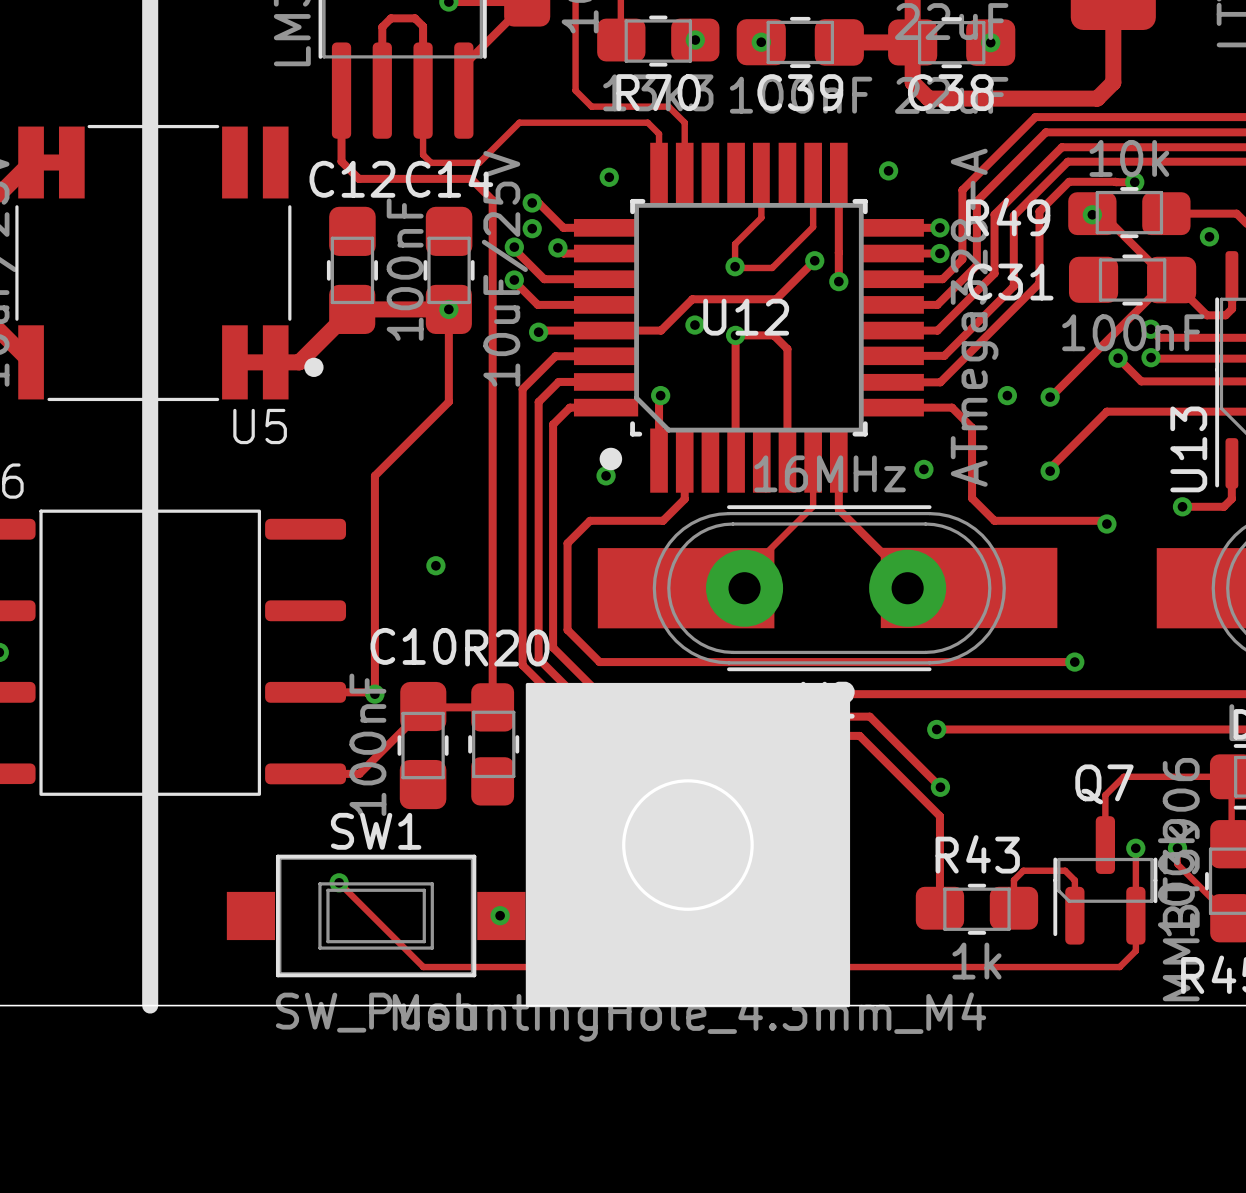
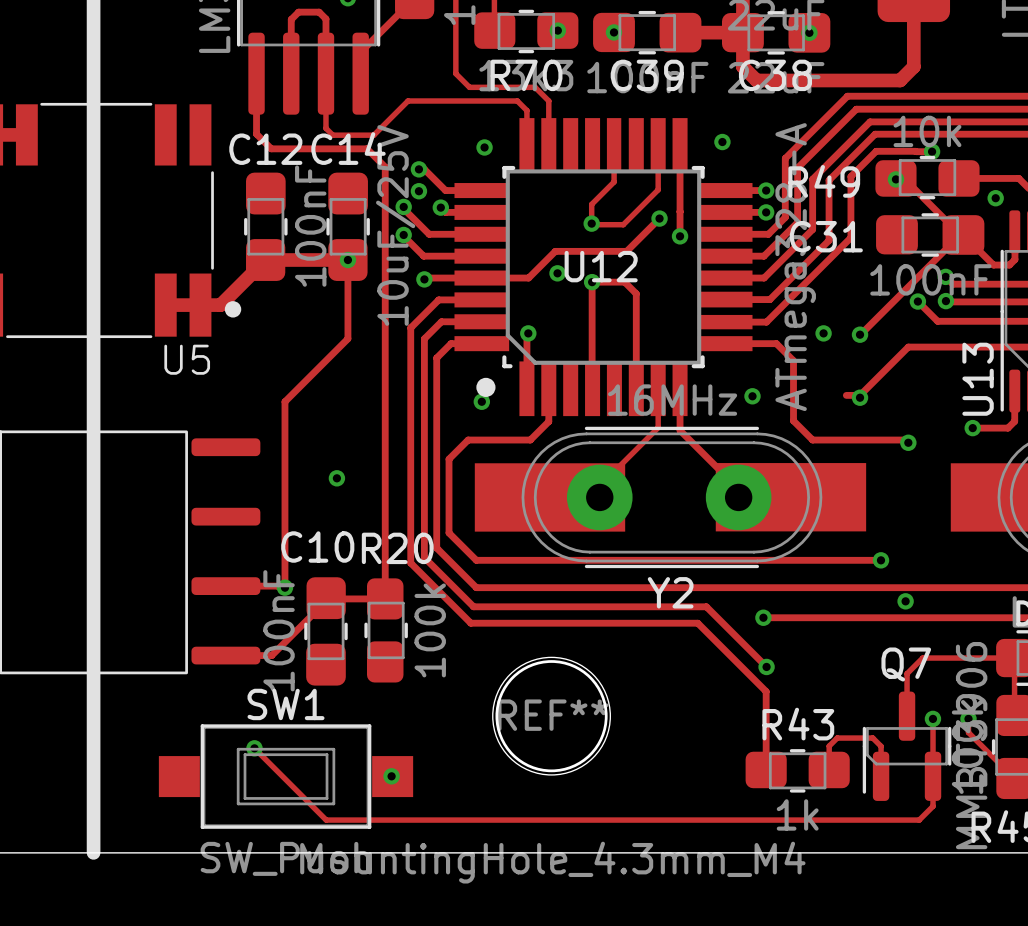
track: none -> (846, 395) (857, 395)
drawing: [525, 682, 851, 1008] -> none
via: none -> (905, 601)

